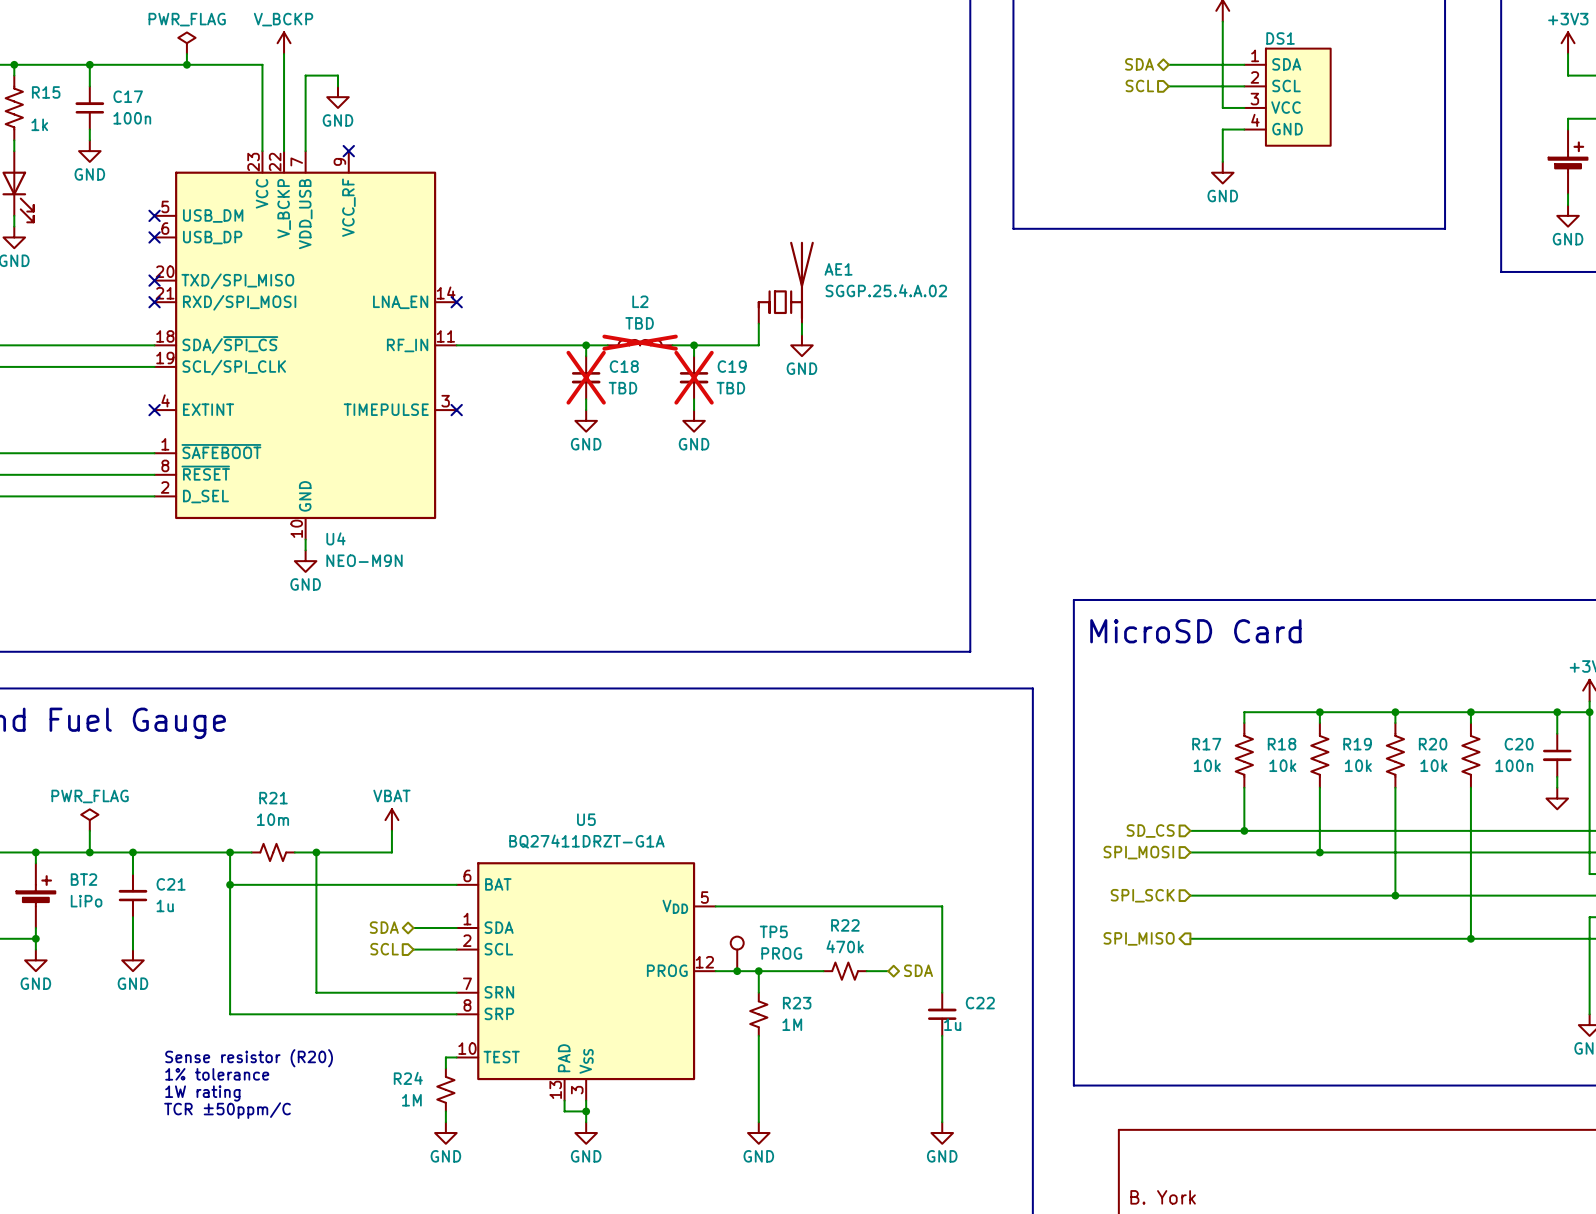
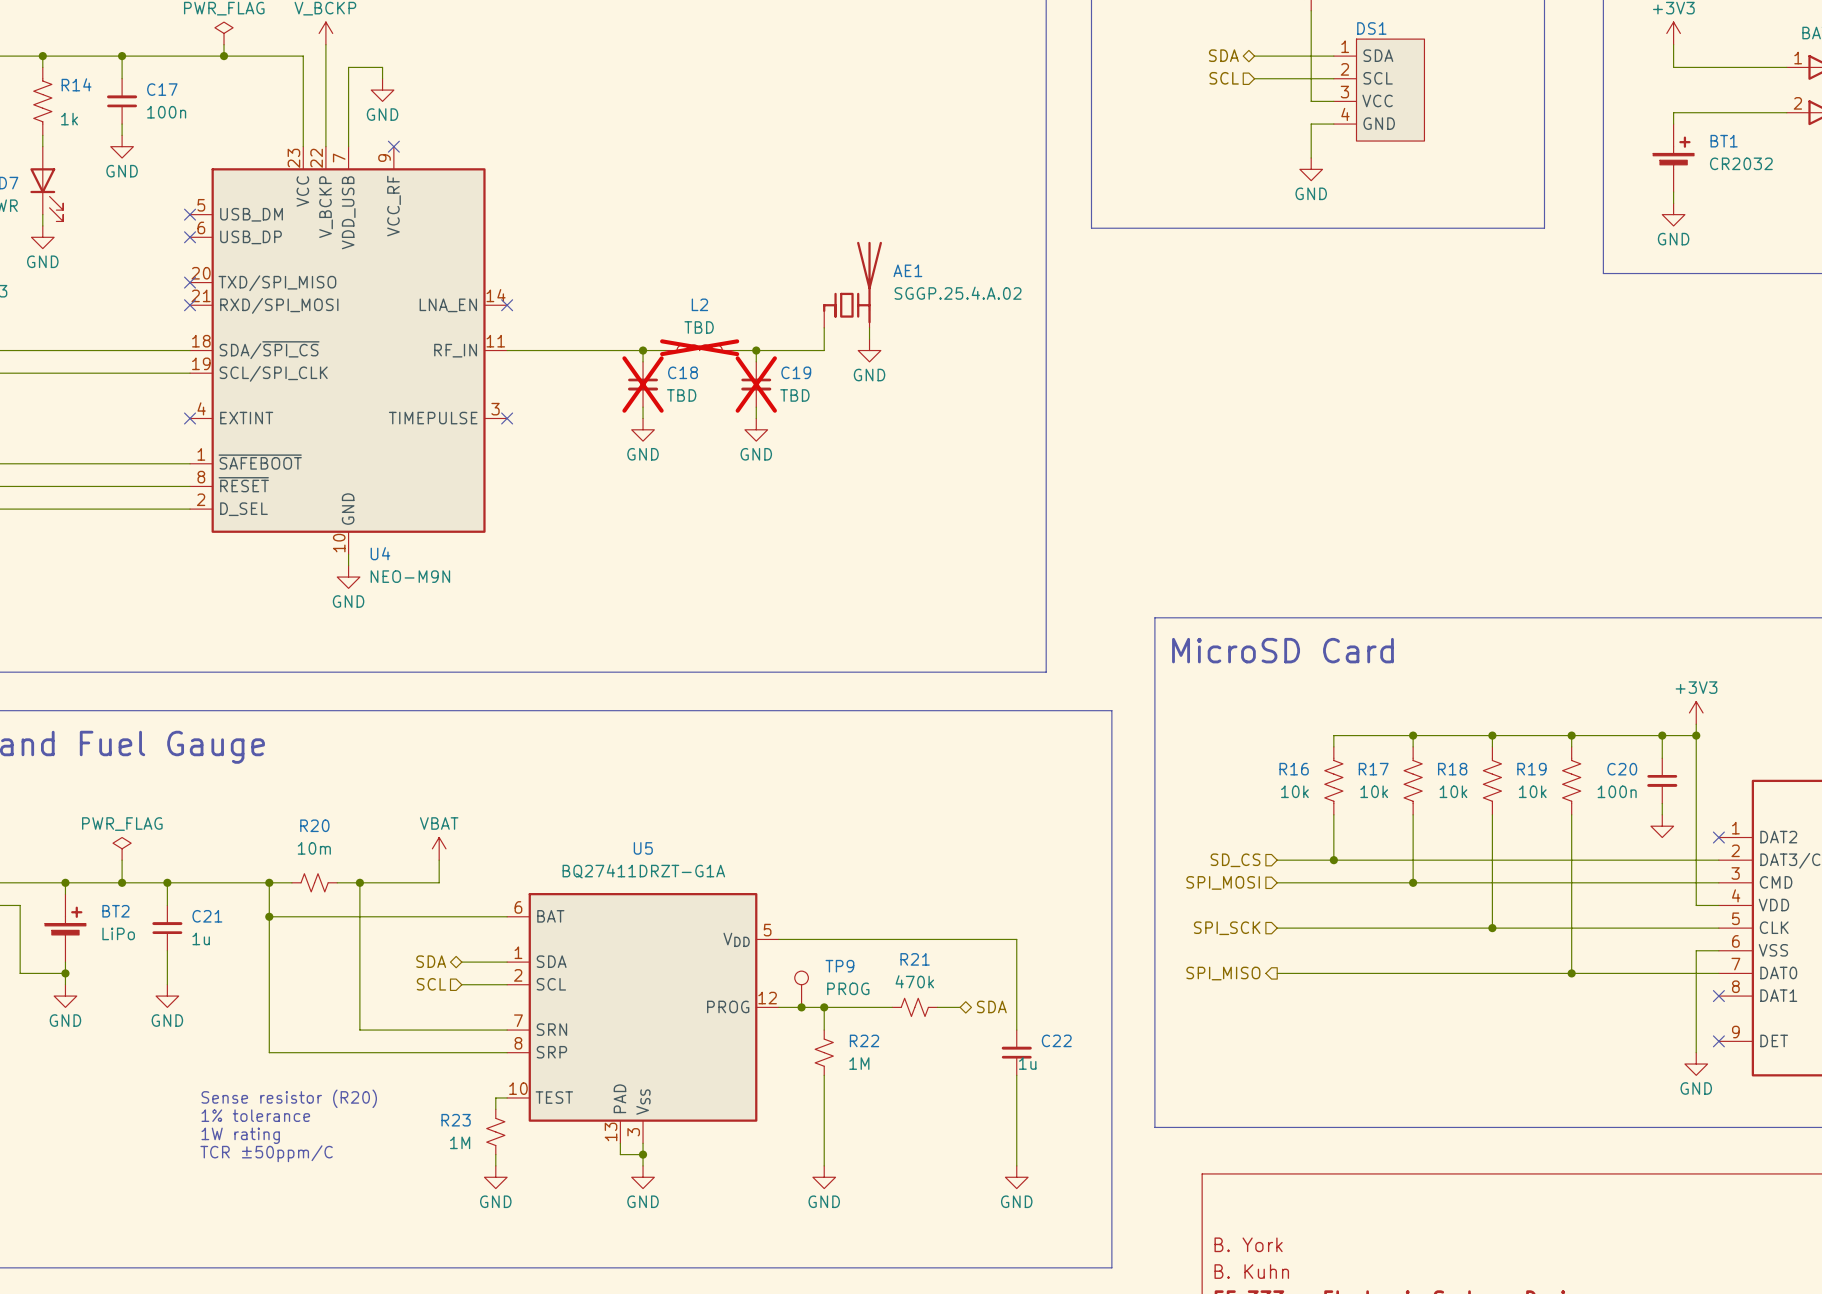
R15 name: R15 (46, 92) -> R14 (76, 84)
R17 name: R17 (1206, 744) -> R16 (1294, 769)
R18 name: R18 (1282, 744) -> R17 (1373, 769)
R19 name: R19 (1357, 744) -> R18 (1452, 769)
R20 name: R20 (1433, 744) -> R19 (1531, 769)
R21 name: R21 (273, 798) -> R20 (314, 825)
R22 name: R22 (845, 925) -> R21 (915, 959)
TP5 name: TP5 (773, 931) -> TP9 (839, 966)
R23 name: R23 (797, 1003) -> R22 (864, 1040)
R24 name: R24 (408, 1078) -> R23 (456, 1120)

